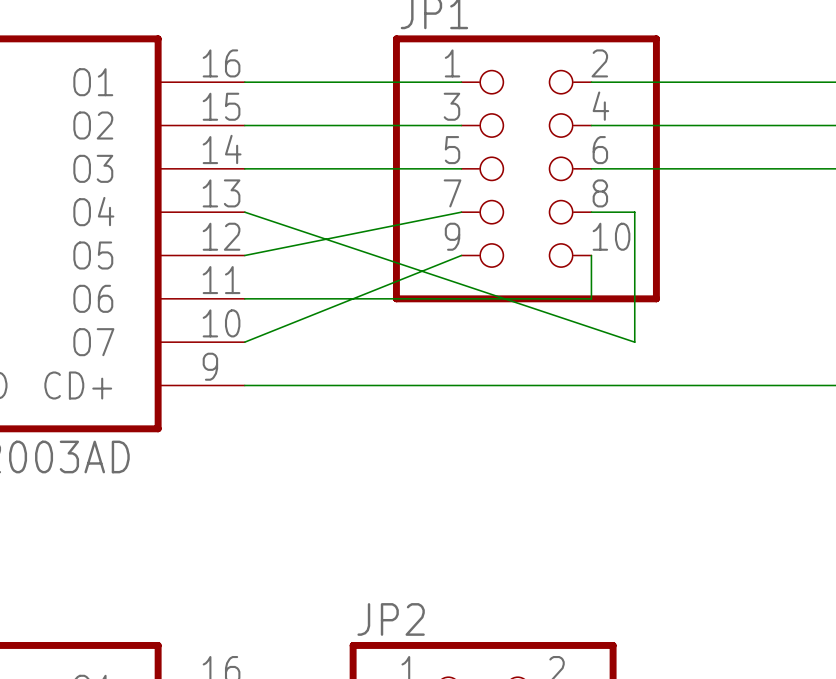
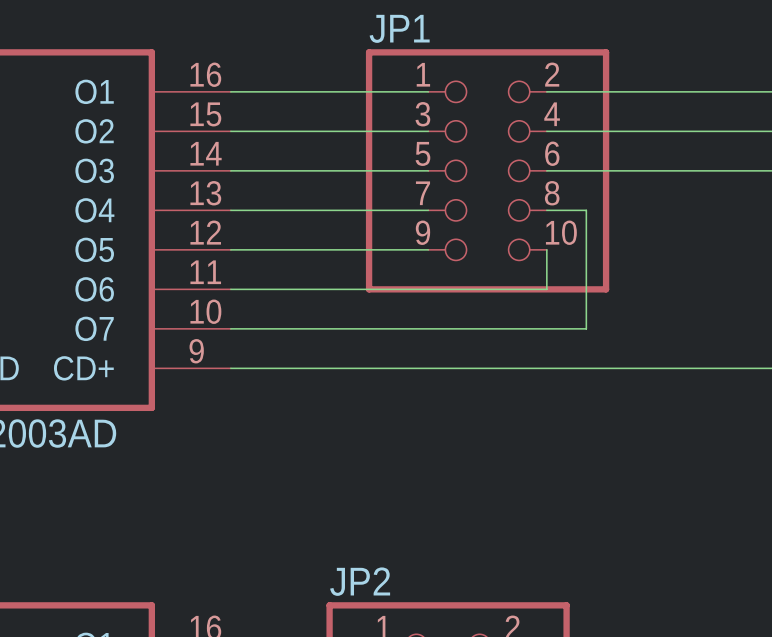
wire: (244, 212) (634, 342) -> (230, 328) (586, 328)
wire: (461, 212) (244, 255) -> (428, 210) (230, 210)
wire: (461, 255) (244, 342) -> (428, 249) (230, 249)

